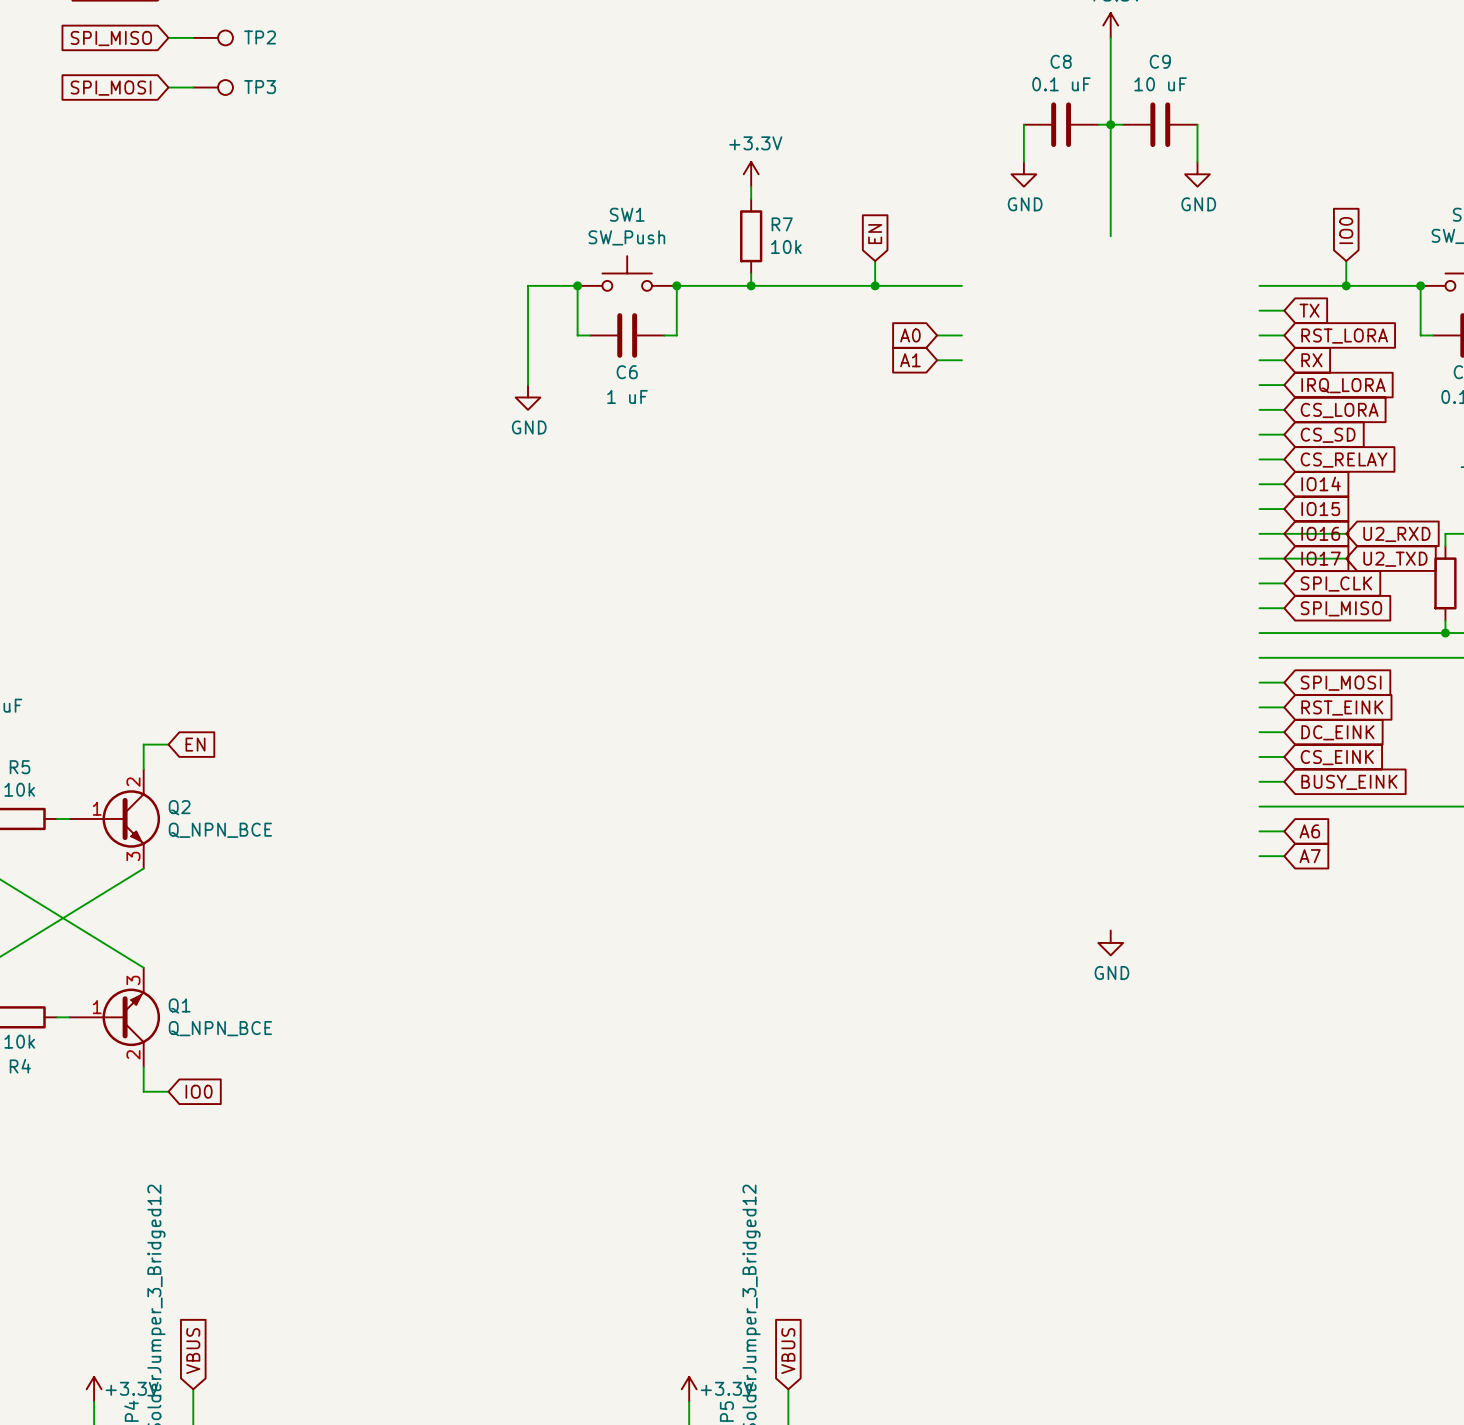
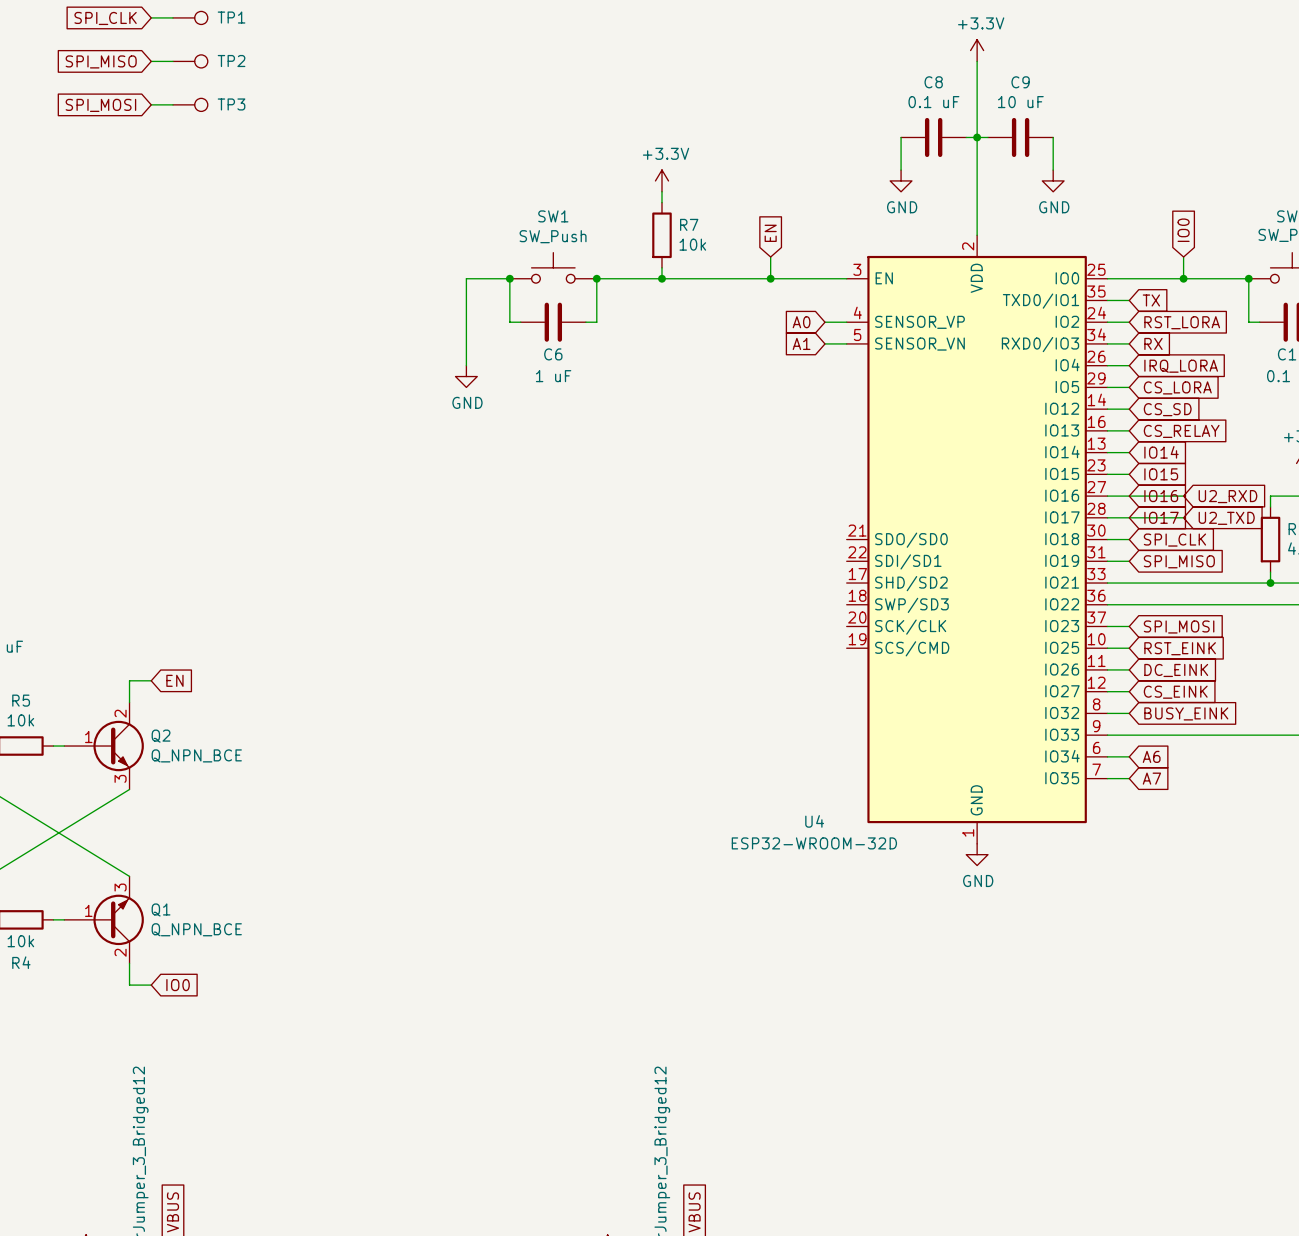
U4: none -> ESP32-WROOM-32D (977, 539)

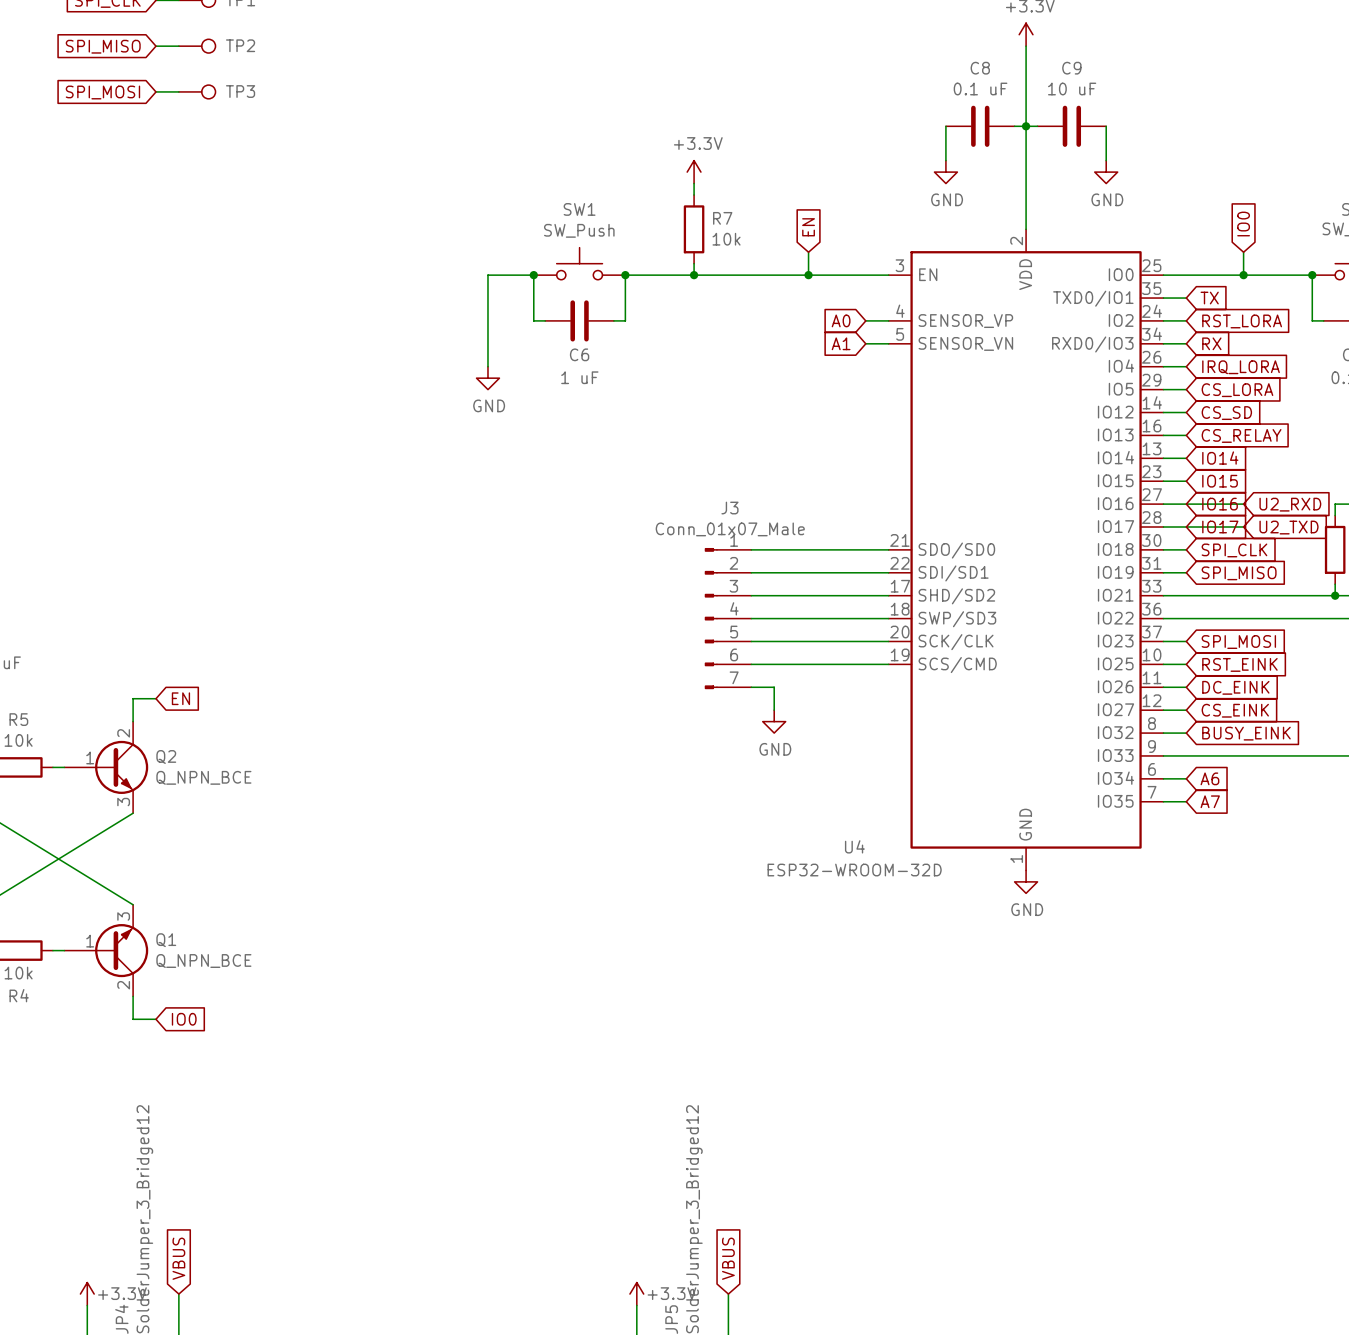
wire: none -> (751, 549) (888, 549)
wire: none -> (751, 572) (888, 572)
wire: none -> (751, 595) (888, 595)
J3: none -> Conn_01x07_Male (728, 618)
wire: none -> (751, 618) (888, 618)
wire: none -> (751, 641) (888, 641)
wire: none -> (751, 664) (888, 664)
wire: none -> (751, 687) (774, 687) (774, 710)
power symbol: none -> GND (774, 721)

